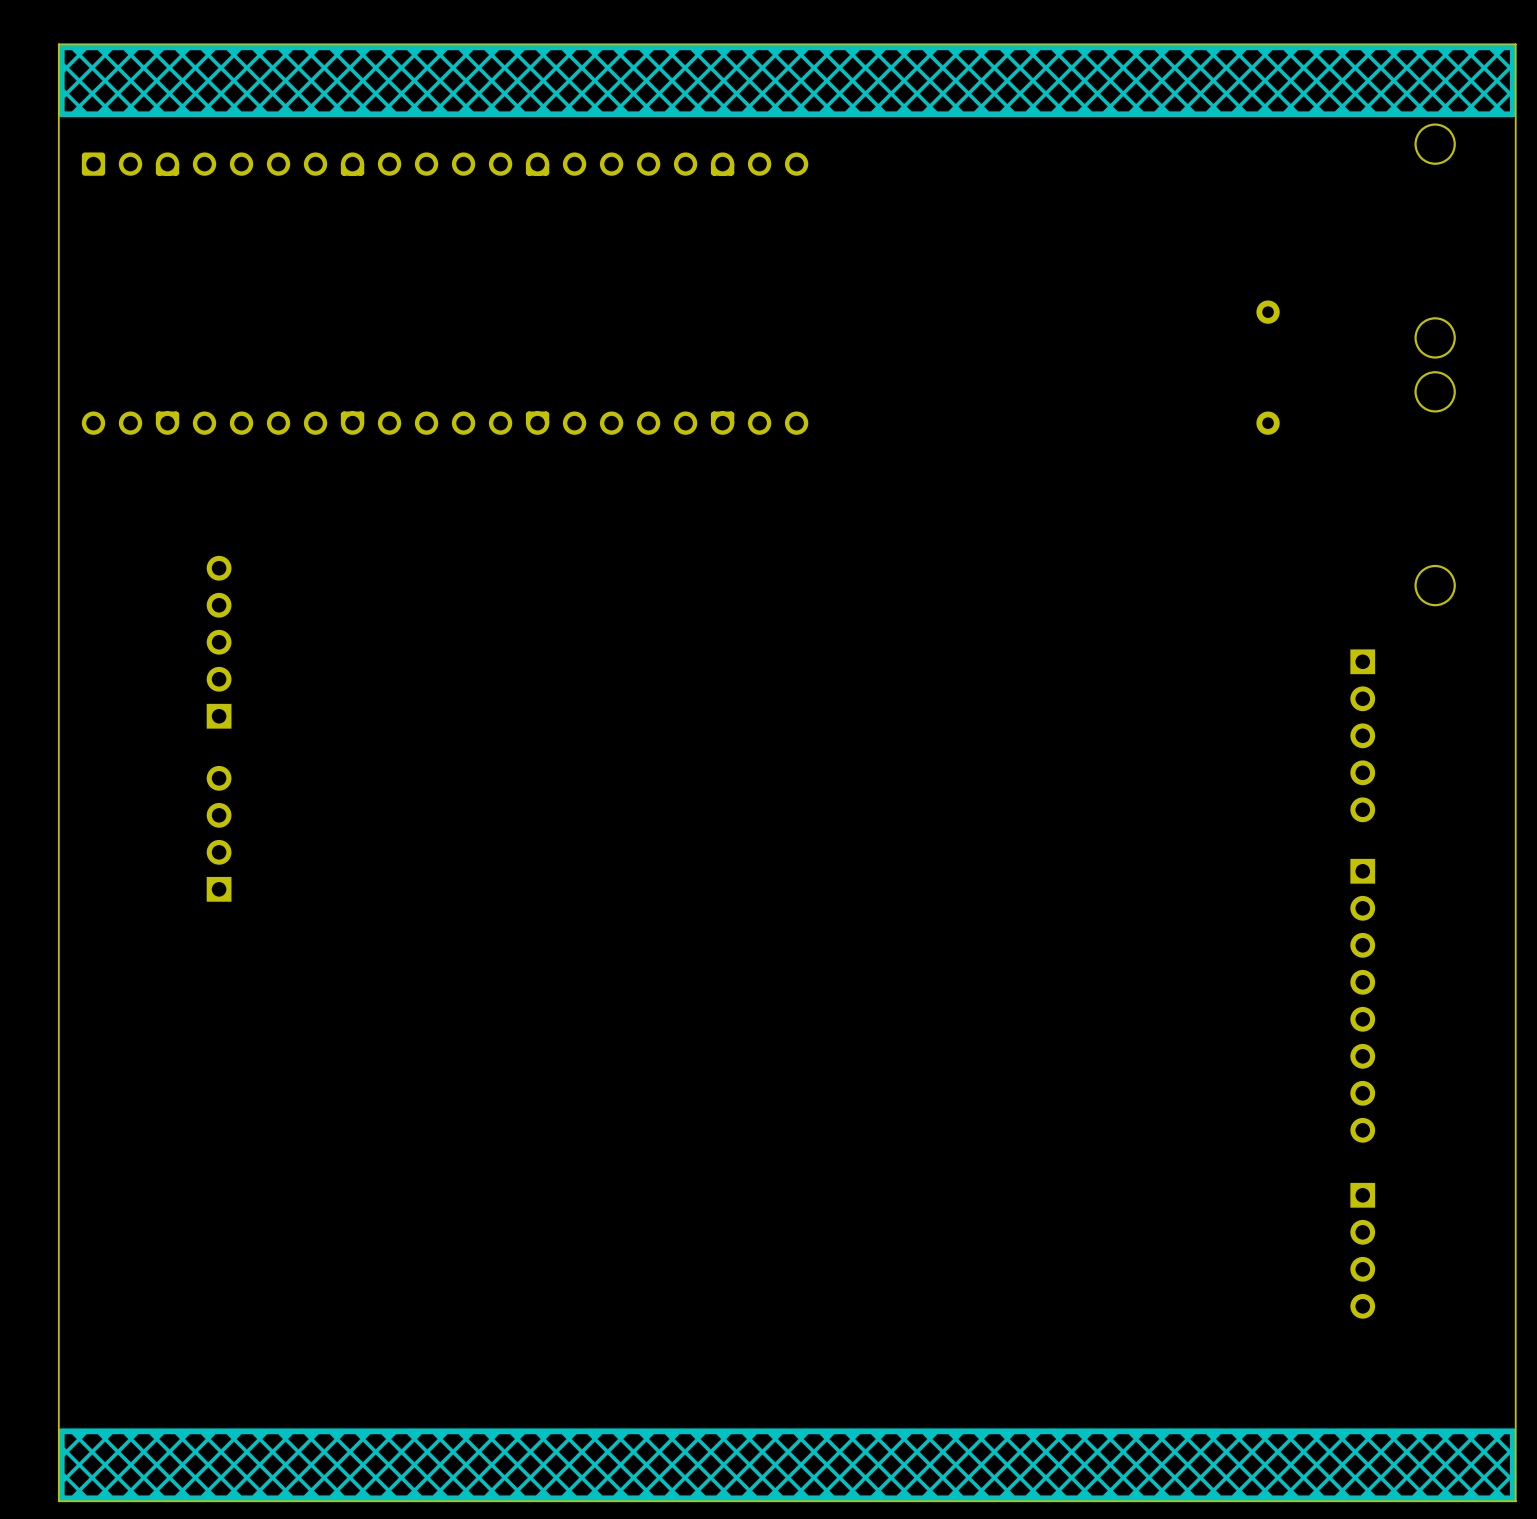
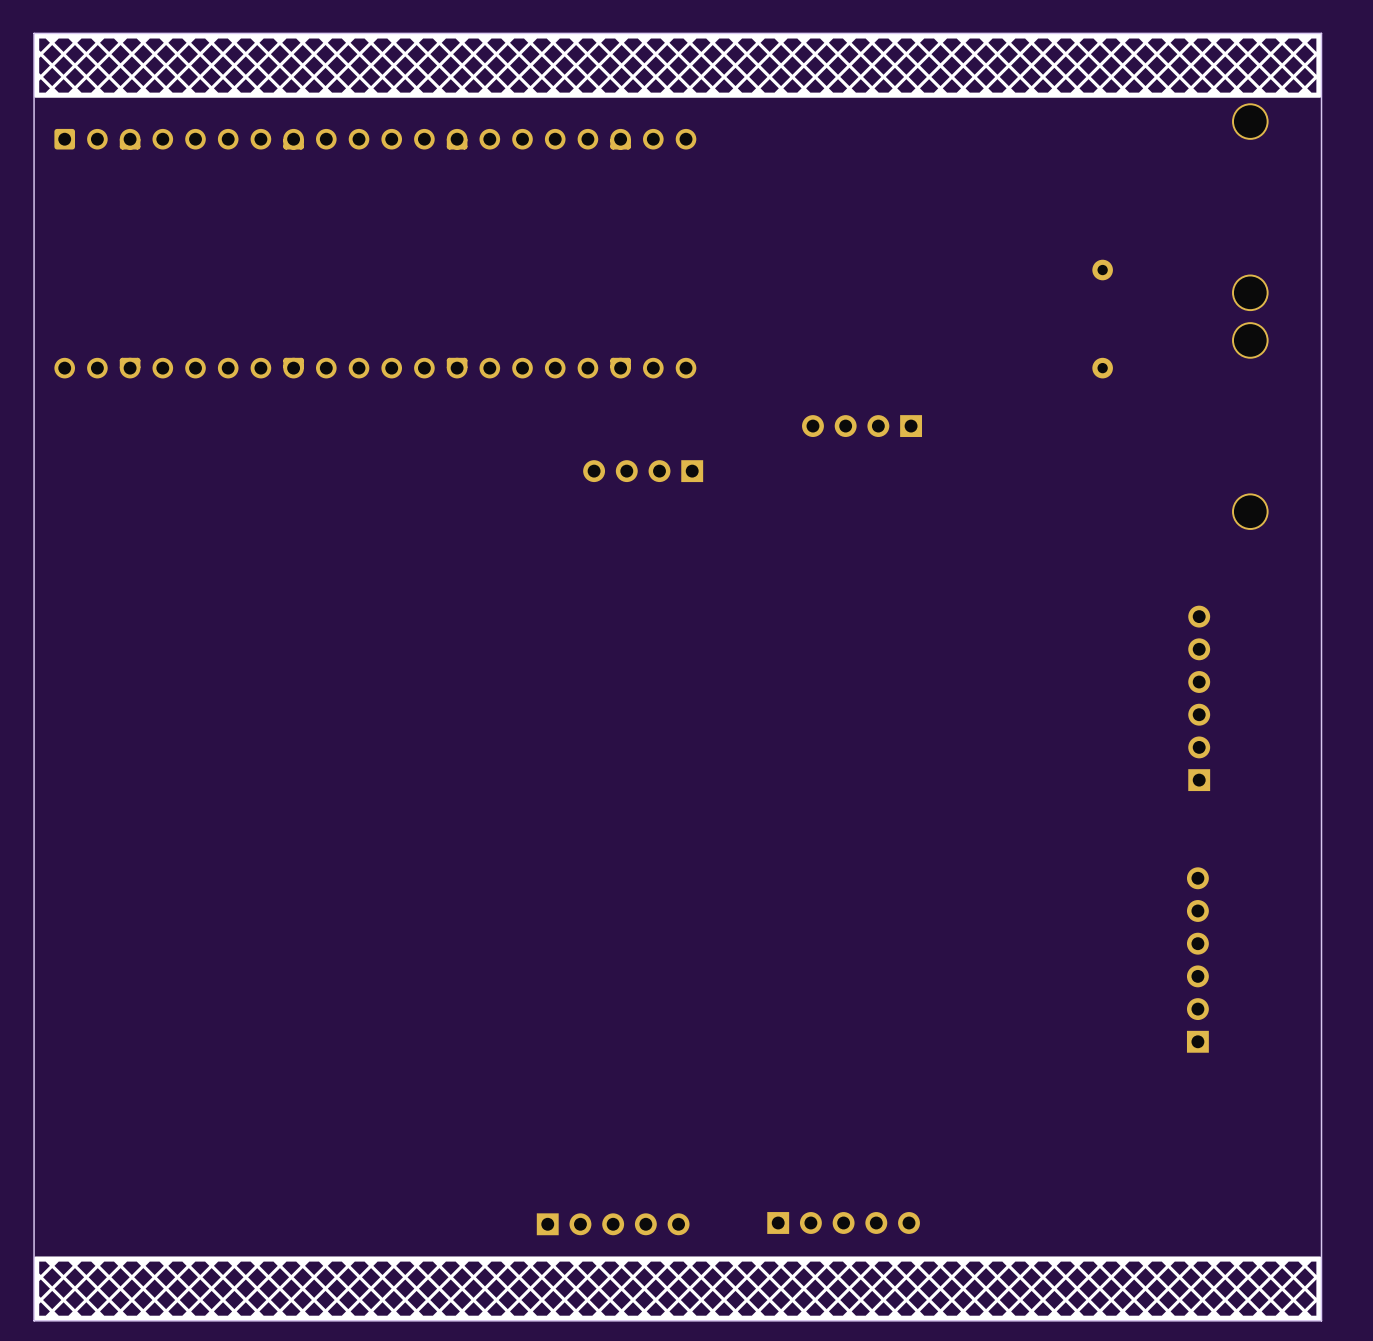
part: none -> (862, 426)
part: none -> (643, 471)
part: (219, 642) -> none
part: (1362, 735) -> none
part: none -> (1199, 698)
part: (219, 833) -> none
part: (1362, 1000) -> none
part: none -> (1197, 960)
part: (1362, 1250) -> none
part: none -> (843, 1222)
part: none -> (613, 1224)

